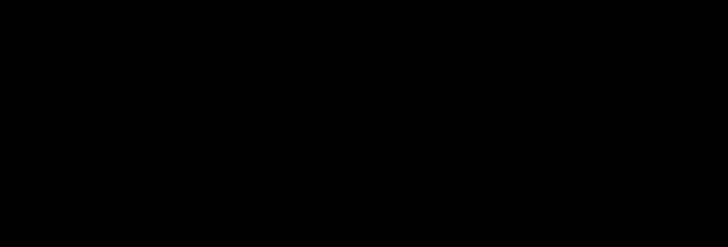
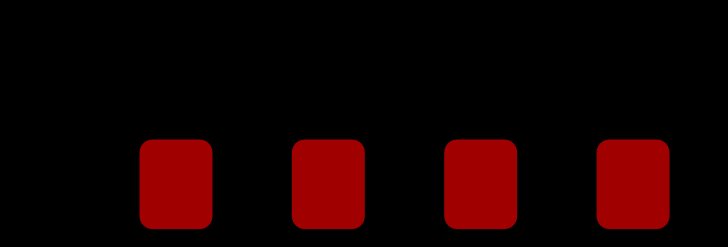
part: none -> (252, 184)
part: none -> (556, 184)

